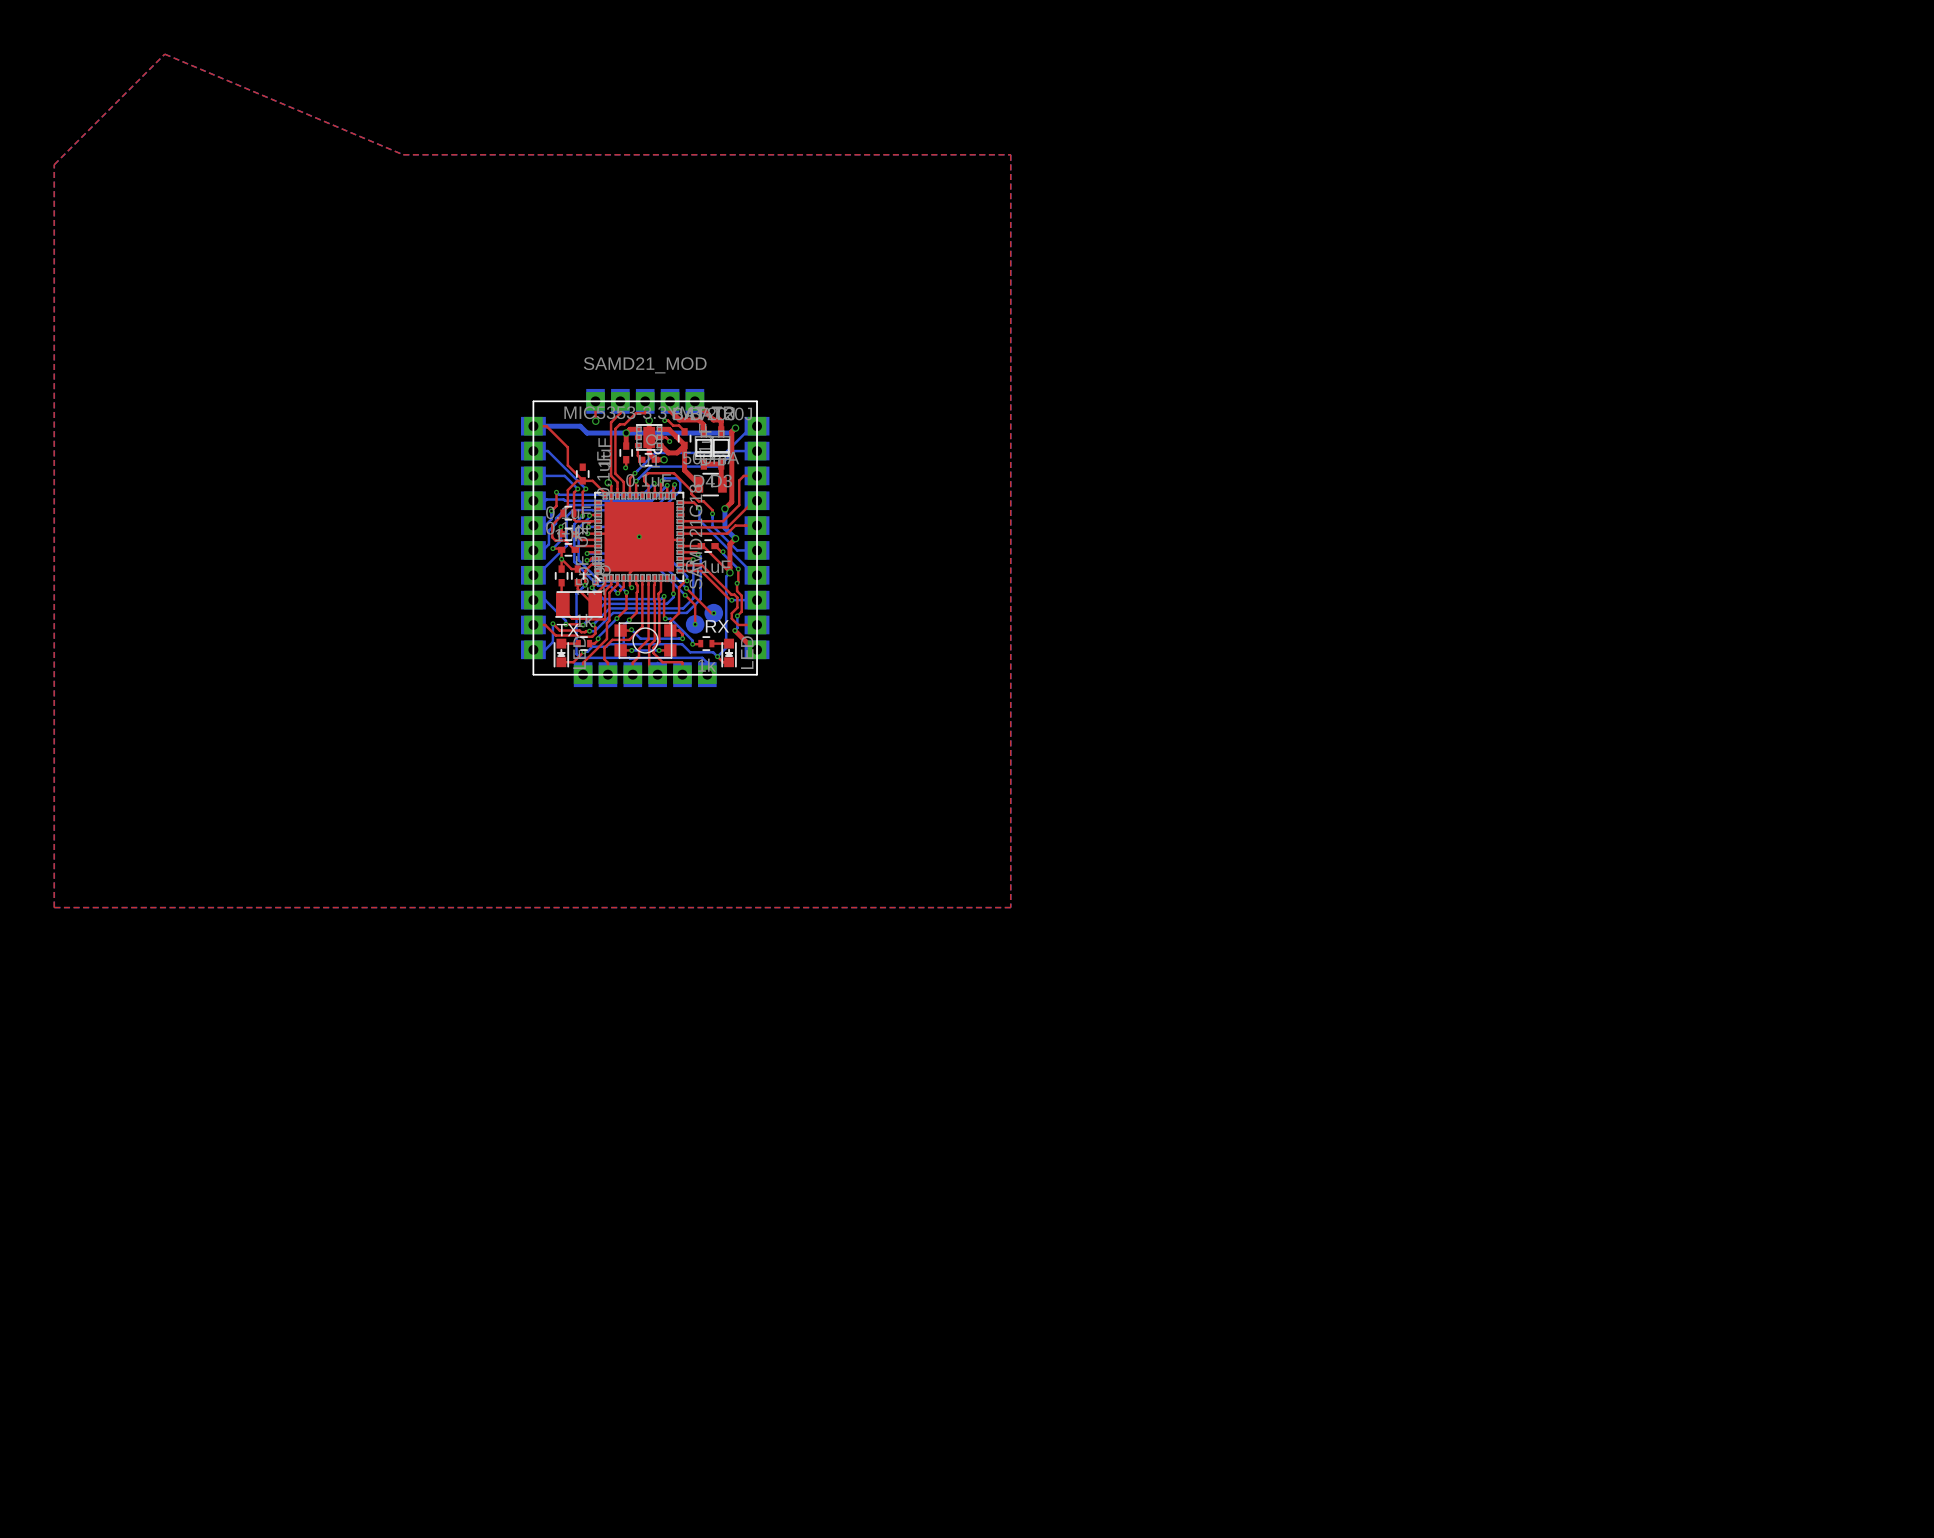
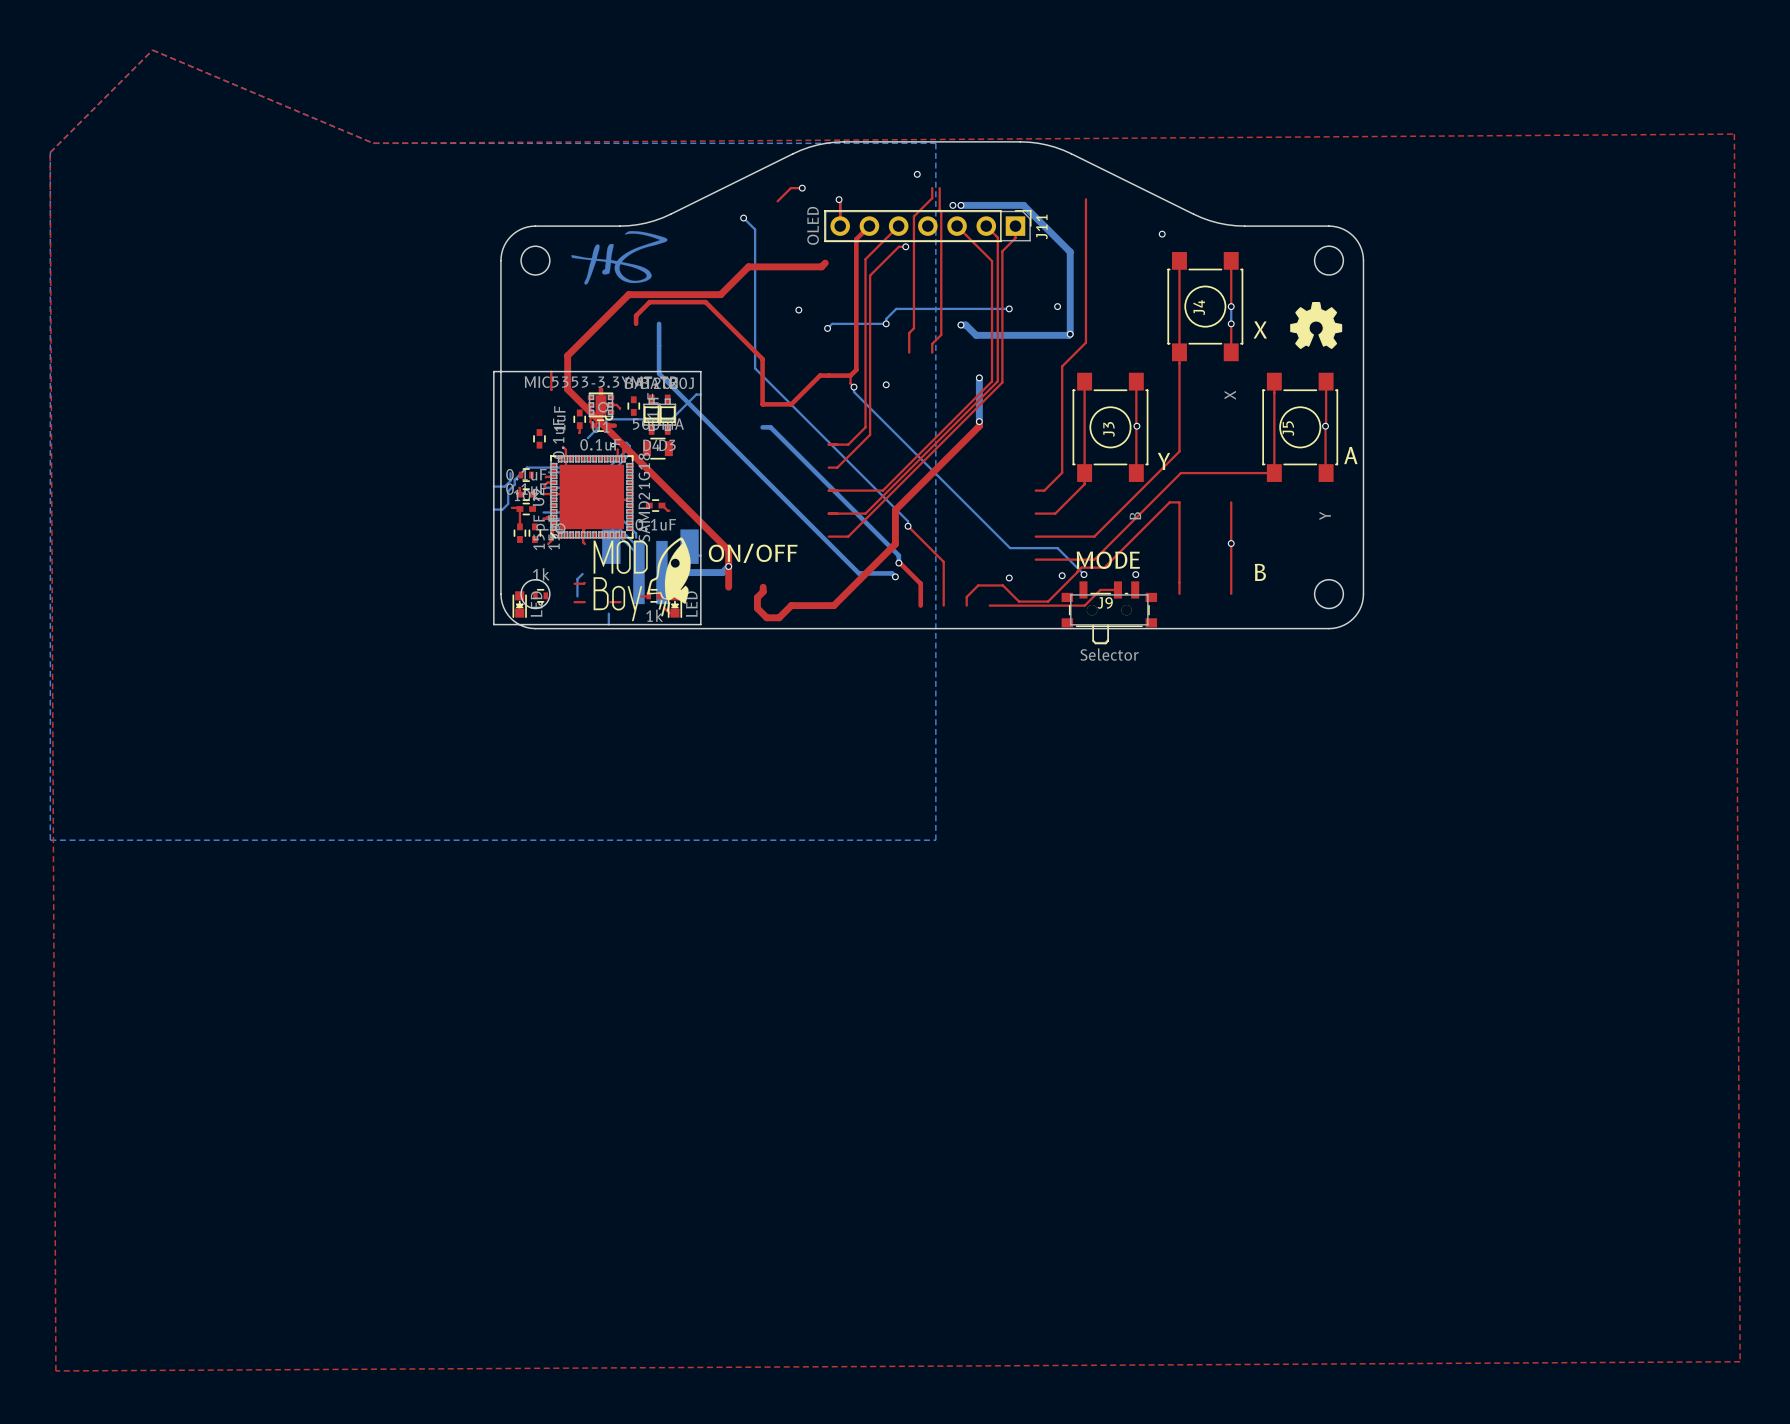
board edge: none -> (844, 141) (1037, 143) (1071, 153) (1210, 220) (1235, 225) (1332, 226) (1343, 229) (1353, 236) (1361, 249) (1363, 260) (1363, 594) (1360, 609) (1353, 618) (1340, 626) (1328, 628) (535, 628) (522, 625) (511, 618) (503, 607) (500, 594) (500, 260) (506, 242) (517, 231) (531, 226) (628, 225) (654, 220) (801, 150) (817, 144) (844, 141)
top zone outline: (403, 154) (1010, 154) (1010, 907) (54, 907) (54, 164) -> (373, 143) (1734, 134) (1740, 1361) (55, 1370) (50, 152)
via: none -> (917, 174)
top track: none -> (802, 188) (790, 188) (777, 201)
via: none -> (802, 188)
top track: none -> (932, 188) (932, 198) (913, 216) (913, 328) (909, 333) (909, 352)
top track: none -> (939, 188) (941, 334) (932, 343) (932, 352)
top track: none -> (839, 199) (840, 226)
via: none -> (839, 199)
top track: none -> (1085, 199) (1085, 342) (1062, 366) (1062, 472) (1044, 490) (1035, 490)
via: none -> (952, 205)
bottom track: none -> (960, 205) (1023, 205) (1070, 251) (1070, 334) (976, 335) (965, 325) (960, 325)
via: none -> (960, 205)
bottom track: none -> (743, 218) (755, 229) (755, 368) (908, 521) (908, 526)
via: none -> (743, 218)
top track: none -> (869, 226) (856, 239) (856, 369) (850, 375)
top track: none -> (898, 226) (865, 259) (865, 427) (848, 444) (828, 444)
J11: none -> OLED (927, 226)
top track: none -> (957, 226) (992, 261) (992, 381) (882, 490) (828, 490)
top track: none -> (986, 226) (997, 237) (997, 381) (865, 513) (828, 513)
top track: none -> (1015, 226) (1015, 238) (1002, 251) (1002, 382) (848, 536) (828, 536)
drawing: none -> [571, 231, 668, 285]
via: none -> (1162, 234)
round board edge: none -> [520, 245, 551, 276]
round board edge: none -> [1314, 245, 1344, 276]
top track: none -> (905, 246) (898, 246) (870, 275) (870, 434) (837, 467) (828, 467)
via: none -> (905, 246)
top track: none -> (1179, 260) (1179, 451) (1094, 536) (1035, 536)
top track: none -> (1231, 260) (1231, 306)
top track: none -> (825, 263) (821, 266) (748, 266) (720, 294) (628, 294) (567, 355) (567, 389) (728, 550) (728, 587)
drawing: none -> [1290, 302, 1343, 349]
via: none -> (1057, 306)
J4: none -> X (1205, 306)
bottom track: none -> (1231, 306) (1231, 323)
via: none -> (1231, 306)
bottom track: none -> (1009, 308) (896, 308) (886, 318) (886, 323) (832, 323) (827, 328)
via: none -> (1009, 308)
via: none -> (798, 310)
top track: none -> (636, 323) (636, 315) (649, 302) (705, 302) (762, 359) (762, 404) (791, 404) (820, 375) (850, 375)
bottom track: none -> (659, 323) (659, 373) (858, 573) (891, 573) (895, 576)
via: none -> (886, 323)
top track: none -> (1231, 323) (1231, 352)
via: none -> (1231, 323)
via: none -> (960, 325)
via: none -> (827, 328)
text: none -> X (1260, 329)
via: none -> (1070, 334)
top track: (620, 401) (620, 413) (611, 422) (611, 475) (617, 482) (617, 494) -> none
top track: (645, 401) (645, 413) (635, 413) (624, 424) (619, 424) (615, 428) (615, 473) (623, 482) (623, 494) -> none
top track: (670, 401) (670, 410) (679, 420) (698, 420) (703, 424) (703, 431) -> none
top track: (694, 401) (713, 420) (721, 421) (721, 431) -> none
top track: none -> (850, 375) (850, 383) (854, 387)
bottom track: none -> (979, 377) (979, 421)
via: none -> (979, 377)
top track: none -> (1084, 381) (1084, 484) (1055, 513) (1035, 513)
top track: none -> (1136, 381) (1136, 473)
top track: none -> (1274, 381) (1274, 473) (1180, 473) (1094, 559) (1035, 559)
top track: none -> (1326, 381) (1326, 473)
via: none -> (886, 384)
bottom track: none -> (854, 387) (854, 391) (1010, 548) (1057, 548) (1084, 574)
via: none -> (854, 387)
via: (649, 420) -> none
top track: (664, 420) (668, 420) (673, 425) (679, 425) (684, 431) -> none
via: (664, 420) -> none
via: (595, 421) -> none
bottom track: (533, 426) (580, 426) (587, 433) (730, 433) (735, 428) -> none
top track: (533, 426) (546, 426) (567, 447) (567, 465) (582, 481) -> none
top track: (735, 428) (731, 431) (731, 501) (724, 508) -> none
via: (735, 428) -> none
top track: (637, 429) (629, 429) (626, 433) (626, 446) -> none
top track: (660, 429) (668, 429) (676, 436) -> none
via: (626, 433) -> none
top track: (676, 436) (684, 444) (684, 470) (698, 484) -> none
via: (669, 441) -> none
top track: (660, 445) (668, 452) (677, 452) (684, 445) -> none
bottom track: (533, 451) (547, 451) (585, 488) -> none
bottom track: (757, 451) (734, 451) (719, 466) (650, 466) (636, 481) -> none
top track: none -> (979, 421) (979, 426) (895, 510) (895, 544) (833, 605) (791, 605) (779, 617) (766, 617) (757, 608) (757, 597) (763, 591) (763, 587)
via: none -> (979, 421)
via: (664, 459) -> none
via: none -> (1136, 426)
via: none -> (1325, 426)
bottom track: none -> (762, 427) (770, 427) (898, 555) (898, 563)
J3: none -> B (1110, 427)
J5: none -> Y (1300, 427)
top track: (703, 464) (721, 464) (722, 484) -> none
via: (625, 467) -> none
top track: (634, 473) (629, 478) (629, 494) -> none
via: (634, 473) -> none
bottom track: (533, 475) (564, 475) (577, 488) -> none
top track: (757, 475) (743, 475) (739, 480) (739, 505) (723, 521) (681, 521) -> none
top track: (662, 480) (661, 494) -> none
top track: (636, 481) (636, 494) -> none
via: (636, 481) -> none
via: (608, 482) -> none
bottom track: (654, 483) (642, 494) (558, 494) (556, 492) -> none
top track: (654, 483) (654, 494) -> none
via: (654, 483) -> none
via: (674, 484) -> none
bottom track: (667, 485) (651, 500) (533, 500) -> none
via: (667, 485) -> none
top track: (577, 488) (574, 492) (574, 519) (576, 521) (591, 521) -> none
via: (577, 488) -> none
top track: (585, 488) (582, 492) (582, 515) -> none
via: (585, 488) -> none
top track: (556, 492) (556, 506) (551, 511) -> none
via: (556, 492) -> none
text: none -> A (1350, 455)
top track: (605, 494) (592, 480) (577, 480) (567, 490) (567, 506) (552, 524) (552, 537) (555, 540) (565, 540) (574, 549) (579, 546) (597, 546) -> none
top track: (648, 494) (648, 485) (644, 481) (644, 476) (647, 473) (674, 473) (691, 490) (691, 493) (698, 501) (703, 501) (712, 510) (712, 513) -> none
text: none -> Y (1163, 461)
top track: (757, 500) (754, 500) (727, 527) (681, 527) -> none
top track: (681, 502) (693, 502) (699, 508) -> none
bottom track: (699, 508) (699, 520) (754, 575) (757, 575) -> none
via: (699, 508) -> none
bottom track: (724, 508) (724, 528) (735, 538) -> none
via: (724, 508) -> none
bottom track: (592, 510) (573, 510) (566, 516) (566, 545) (537, 575) (533, 575) -> none
via: (551, 511) -> none
bottom track: (712, 513) (712, 525) (737, 550) (757, 550) -> none
via: (712, 513) -> none
bottom track: (582, 515) (574, 524) (574, 561) (598, 585) (610, 585) (617, 593) -> none
via: (582, 515) -> none
bottom track: (589, 515) (578, 528) (578, 560) (600, 581) (615, 581) (626, 592) -> none
via: (589, 515) -> none
top track: (757, 525) (735, 525) (727, 533) (681, 533) -> none
bottom track: (561, 526) (561, 540) (552, 548) -> none
via: (561, 526) -> none
via: (588, 526) -> none
via: (587, 533) -> none
top track: (575, 534) (580, 539) (597, 539) -> none
via: (639, 536) -> none
part: SAMD21_MOD (645, 538) -> none
top track: (735, 538) (729, 544) (729, 572) (703, 546) (681, 546) -> none
via: (735, 538) -> none
top track: none -> (1231, 502) (1231, 593)
via: (552, 548) -> none
bottom track: (723, 551) (738, 569) -> none
via: (723, 551) -> none
top track: (597, 552) (587, 553) -> none
top track: (681, 552) (696, 552) (698, 554) -> none
via: (587, 553) -> none
bottom track: (698, 554) (700, 556) (700, 599) (686, 612) (613, 612) (594, 631) (589, 631) -> none
via: (698, 554) -> none
top track: (561, 559) (571, 569) (577, 569) -> none
via: (561, 559) -> none
top track: (681, 559) (693, 559) -> none
bottom track: (693, 559) (693, 598) (683, 608) (609, 608) (592, 624) -> none
via: (693, 559) -> none
via: (587, 560) -> none
top track: (597, 564) (591, 564) (585, 570) (585, 585) -> none
top track: (681, 564) (702, 565) (731, 594) (737, 597) (737, 607) (731, 613) (731, 618) (738, 624) (757, 624) -> none
top track: none -> (908, 526) (943, 561) (943, 605)
via: none -> (908, 526)
top track: (738, 569) (737, 591) (741, 595) (741, 611) (737, 615) -> none
via: (738, 569) -> none
top track: (681, 570) (701, 570) (731, 600) -> none
bottom track: (729, 572) (726, 576) (726, 647) (717, 656) (713, 652) (690, 652) (682, 644) (608, 644) (606, 646) (592, 646) (587, 651) (583, 651) -> none
via: (729, 572) -> none
top track: (605, 578) (605, 584) (595, 594) (595, 604) (577, 588) (577, 582) -> none
top track: (611, 578) (611, 584) (605, 590) (604, 619) (572, 618) (562, 609) (561, 582) -> none
top track: (617, 578) (617, 584) (609, 592) (606, 639) (583, 662) (583, 674) -> none
top track: (623, 578) (623, 586) (617, 593) -> none
top track: (636, 578) (636, 612) (629, 620) -> none
top track: (642, 578) (642, 626) (629, 639) (612, 639) (604, 647) (604, 659) (607, 662) (607, 674) -> none
top track: (648, 578) (648, 639) (639, 649) (639, 656) (632, 662) (632, 674) -> none
top track: (654, 578) (654, 640) (649, 645) (649, 666) (657, 674) -> none
top track: (661, 578) (661, 591) (658, 593) (659, 641) (653, 647) (653, 653) (662, 662) (681, 662) (682, 674) -> none
top track: (673, 578) (673, 593) -> none
drawing: none -> [593, 537, 691, 622]
top track: (687, 580) (679, 587) (679, 613) (670, 621) (670, 630) (679, 630) (682, 634) (682, 638) -> none
via: (687, 580) -> none
via: (737, 583) -> none
bottom track: (585, 585) (576, 593) (576, 653) (580, 657) (702, 657) (707, 662) (707, 674) -> none
via: (585, 585) -> none
bottom track: (592, 587) (603, 599) (661, 599) (664, 596) -> none
via: (592, 587) -> none
via: (631, 587) -> none
via: none -> (1231, 543)
top track: (686, 588) (711, 613) (713, 613) -> none
via: (686, 588) -> none
top track: (626, 592) (626, 608) (616, 618) -> none
via: (626, 592) -> none
via: (617, 593) -> none
bottom track: (673, 593) (673, 597) (666, 603) (604, 603) (583, 625) -> none
via: (673, 593) -> none
top track: (685, 595) (695, 605) (695, 624) -> none
via: (685, 595) -> none
top track: (664, 596) (665, 618) -> none
via: (664, 596) -> none
text: none -> ON/OFF (753, 553)
bottom track: (533, 600) (545, 600) (565, 620) (565, 624) -> none
via: (731, 600) -> none
part: (579, 604) -> none
text: none -> MODE (1108, 560)
top track: none -> (898, 563) (920, 583) (920, 605)
via: none -> (898, 563)
bottom track: none -> (728, 566) (722, 572) (661, 572)
via: none -> (728, 566)
part: none -> (650, 566)
part: (713, 613) -> none
via: (713, 613) -> none
bottom track: (737, 615) (737, 628) (734, 630) -> none
via: (737, 615) -> none
bottom track: (616, 618) (598, 638) -> none
via: (616, 618) -> none
bottom track: (665, 618) (670, 618) (692, 640) (692, 644) -> none
via: (665, 618) -> none
text: none -> B (1260, 572)
via: (629, 620) -> none
via: none -> (1084, 574)
via: none -> (1135, 574)
via: none -> (1062, 575)
bottom track: (552, 623) (552, 642) (545, 649) (533, 649) -> none
top track: (552, 623) (559, 630) (589, 631) -> none
via: (552, 623) -> none
via: none -> (895, 576)
top track: (533, 624) (545, 624) (555, 635) (578, 636) (592, 636) (595, 633) (595, 627) (592, 624) -> none
top track: (565, 624) (583, 625) -> none
via: (565, 624) -> none
via: (592, 624) -> none
part: (695, 624) -> none
via: (695, 624) -> none
via: none -> (1009, 578)
round board edge: none -> [520, 579, 551, 610]
via: (583, 625) -> none
round board edge: none -> [1314, 579, 1344, 610]
text: RX (717, 626) -> none
bottom track: (631, 629) (640, 638) (682, 638) -> none
via: (631, 629) -> none
text: TX (567, 630) -> none
top track: (734, 630) (754, 649) (757, 649) -> none
via: (734, 630) -> none
via: (589, 631) -> none
top track: none -> (1117, 589) (1100, 589) (1084, 605) (989, 605)
top track: (598, 638) (594, 643) (589, 643) -> none
via: (598, 638) -> none
via: (682, 638) -> none
part: (645, 640) -> none
top track: none -> (1179, 593) (1179, 502) (1169, 502) (1104, 567) (1081, 567) (1048, 601) (1019, 601) (1002, 585) (978, 585) (966, 596) (966, 605)
top track: (561, 643) (578, 643) -> none
top track: (711, 643) (729, 643) -> none
via: (692, 644) -> none
bottom track: (631, 650) (659, 650) -> none
via: (631, 650) -> none
via: (659, 650) -> none
top track: (583, 651) (573, 662) (561, 662) -> none
via: (717, 656) -> none
J9: none -> Selector (1109, 612)

